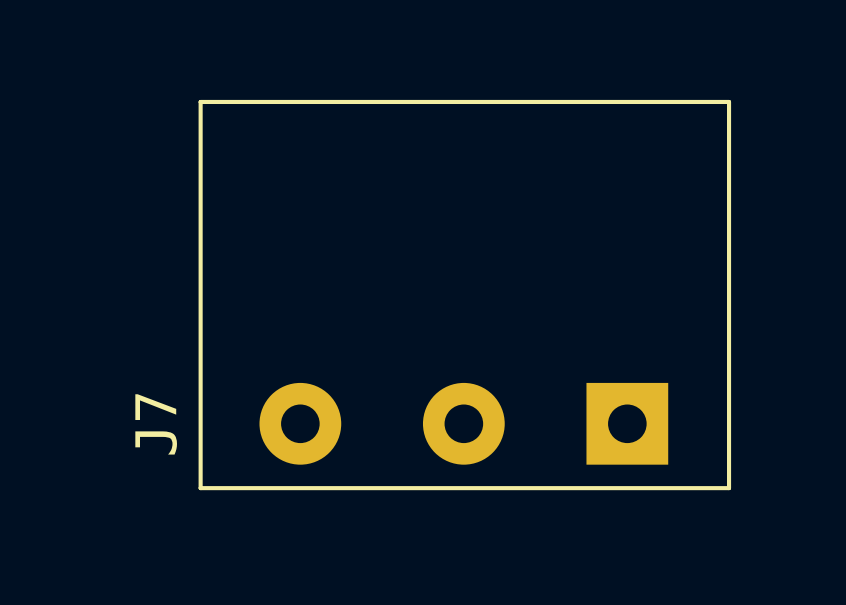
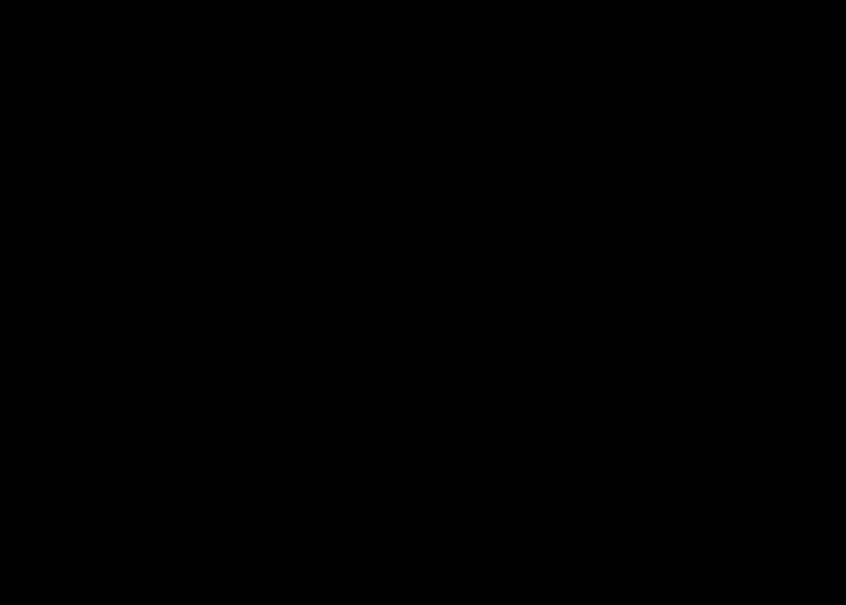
J7: (464, 295) -> none

